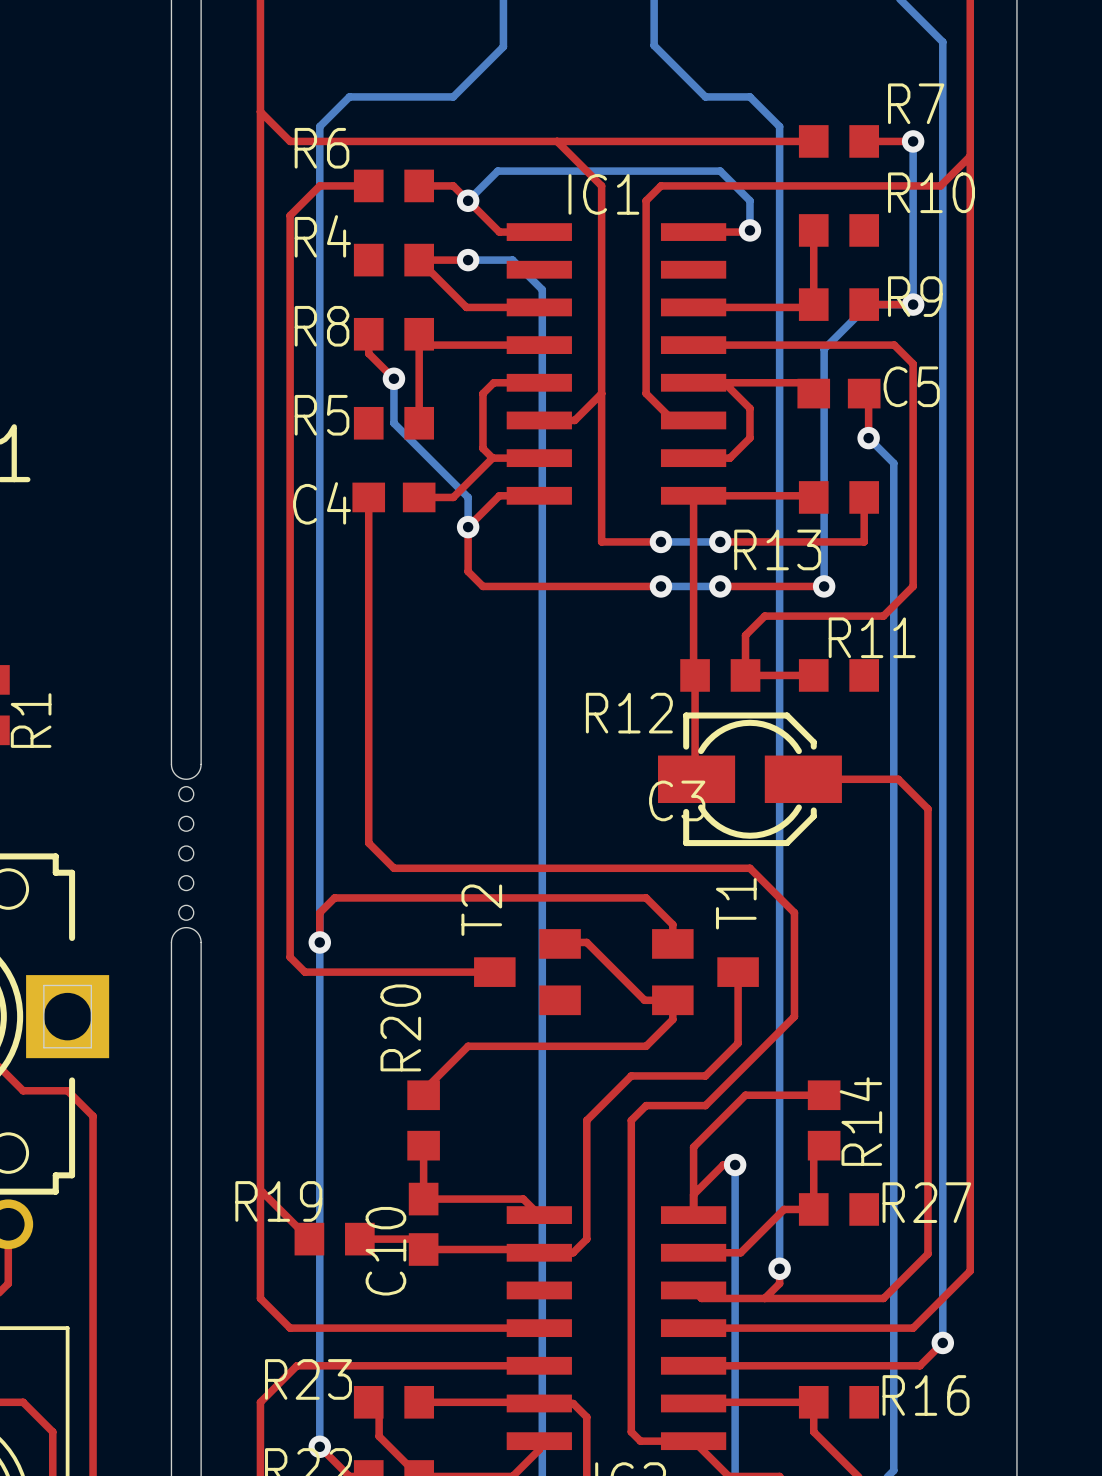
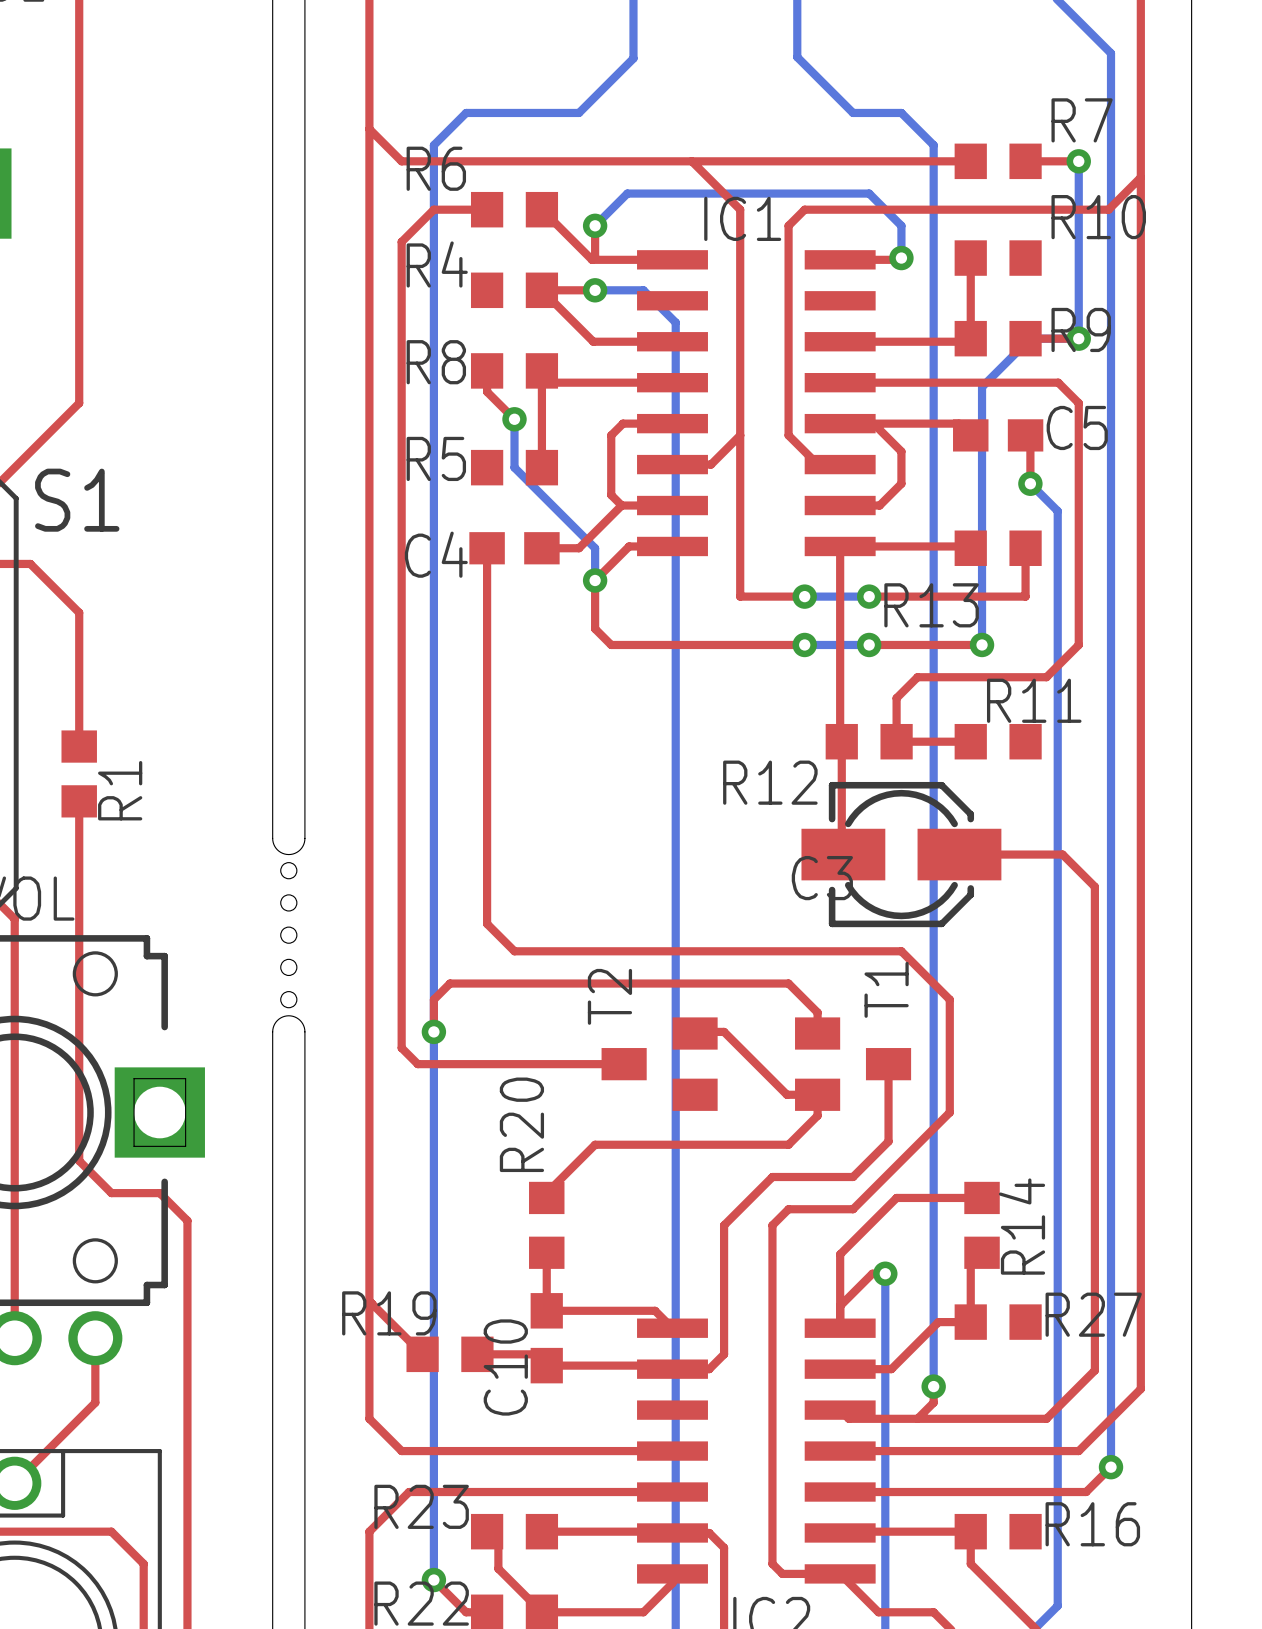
top track: (419, 185) (453, 185) (499, 232) -> (541, 209) (592, 259)
top track: none -> (595, 225) (595, 256) (592, 259)
top track: none -> (592, 259) (629, 259)

